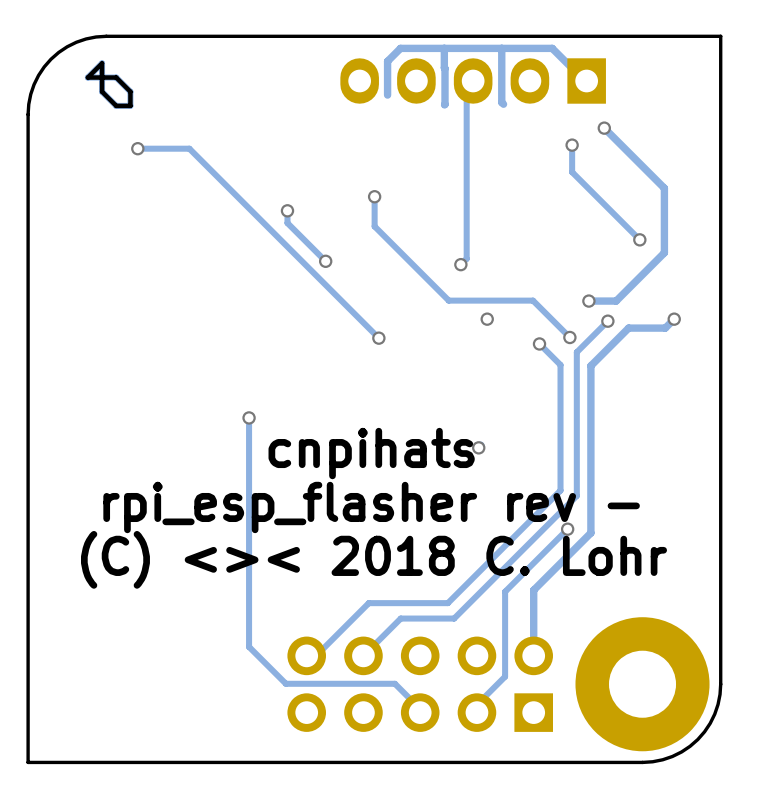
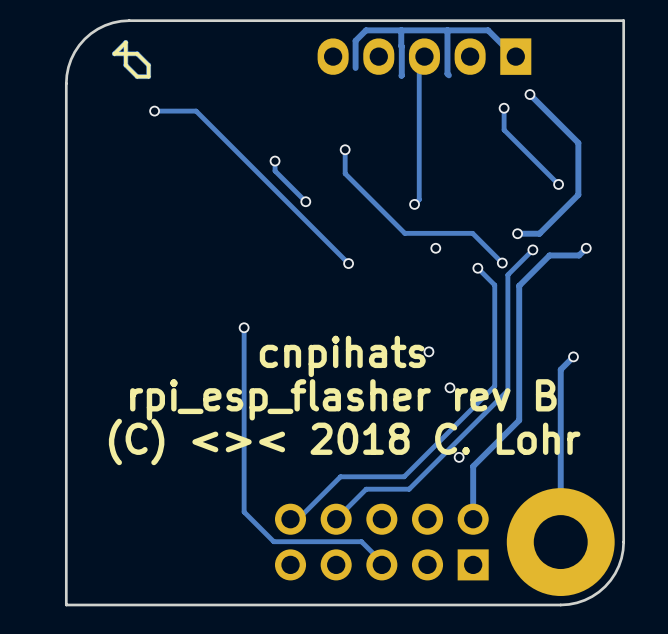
track: none -> (573, 356) (560, 369) (560, 542)
via: none -> (573, 356)
via: none -> (449, 387)
text: rpi_esp_flasher rev - (371, 507) -> rpi_esp_flasher rev B (343, 399)
track: (567, 529) (505, 591) (505, 676) (476, 704) -> none
via: (567, 529) -> none
via: none -> (459, 457)

